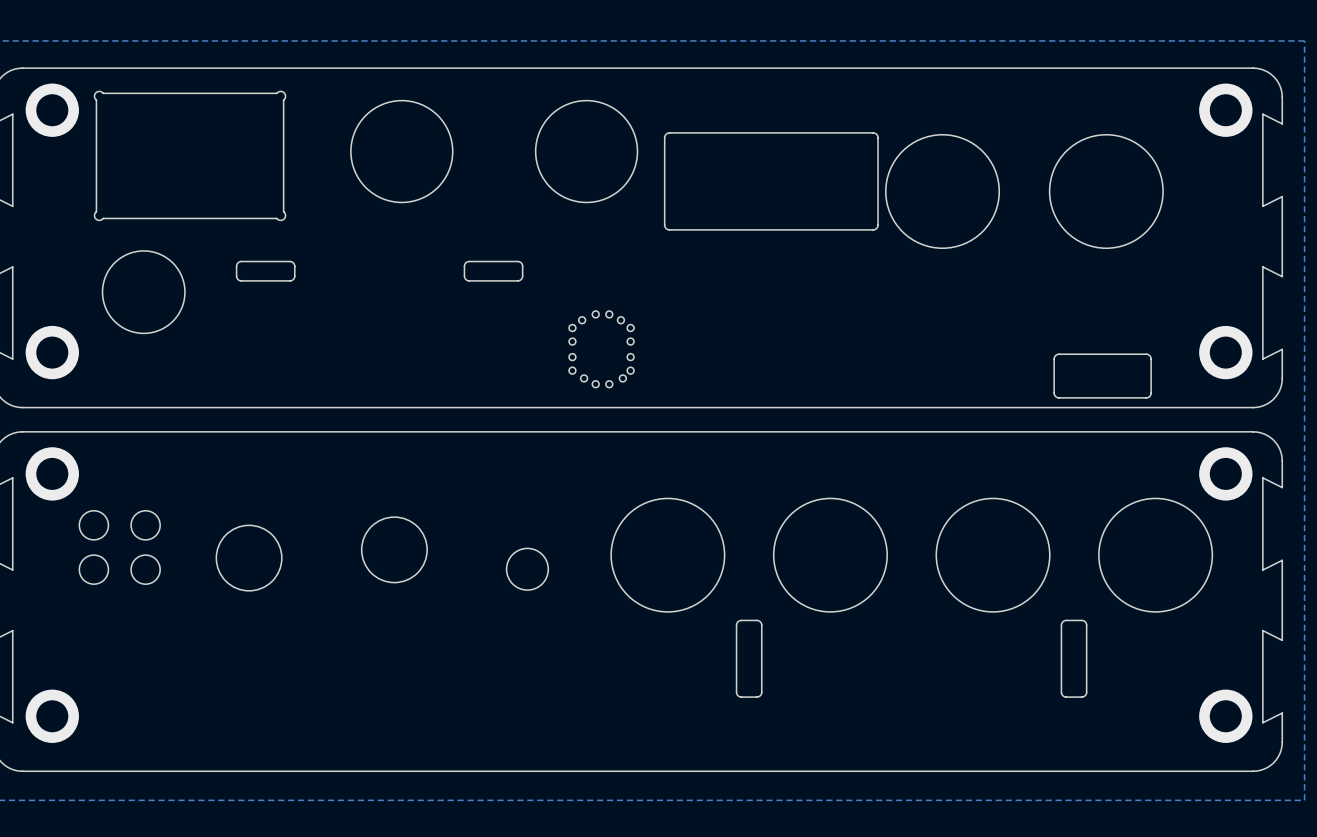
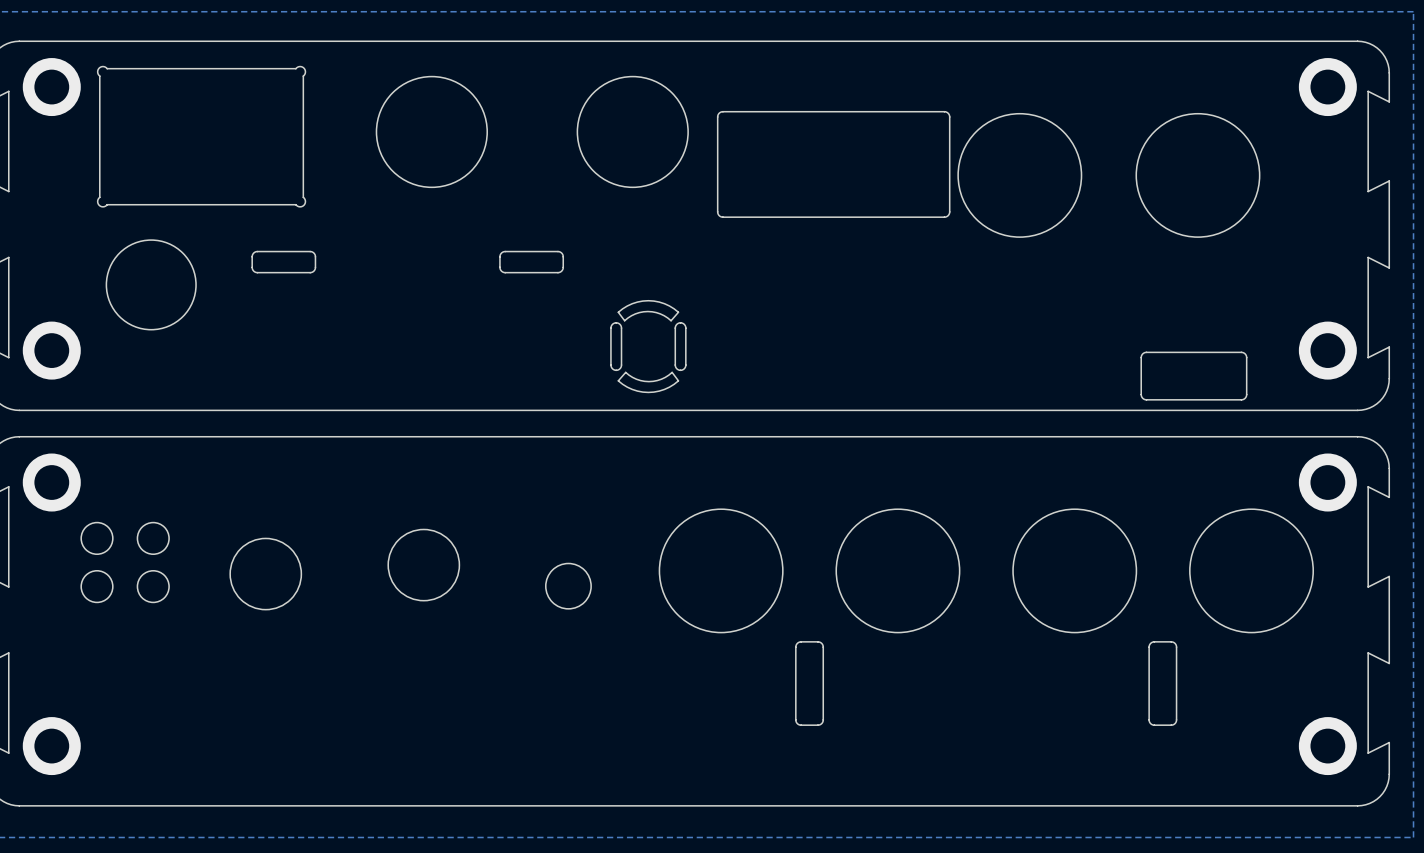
hole: (595, 314) -> none
hole: (609, 314) -> none
board edge: none -> (678, 312) (671, 320) (660, 313) (647, 311) (635, 313) (624, 320) (618, 312) (632, 303) (648, 300) (664, 303) (678, 312)
hole: (582, 320) -> none
hole: (620, 320) -> none
board edge: none -> (616, 322) (619, 324) (621, 328) (621, 365) (616, 370) (612, 368) (610, 365) (611, 327) (616, 322)
hole: (572, 327) -> none
board edge: none -> (680, 322) (684, 324) (685, 328) (685, 365) (680, 370) (676, 368) (675, 365) (675, 327) (680, 322)
hole: (630, 327) -> none
hole: (572, 341) -> none
hole: (630, 341) -> none
hole: (572, 357) -> none
hole: (630, 357) -> none
hole: (572, 370) -> none
hole: (630, 370) -> none
board edge: none -> (672, 372) (678, 380) (664, 389) (653, 392) (632, 389) (618, 380) (625, 372) (636, 379) (648, 381) (661, 379) (672, 372)
hole: (584, 378) -> none
hole: (622, 378) -> none
hole: (595, 384) -> none
hole: (609, 384) -> none

